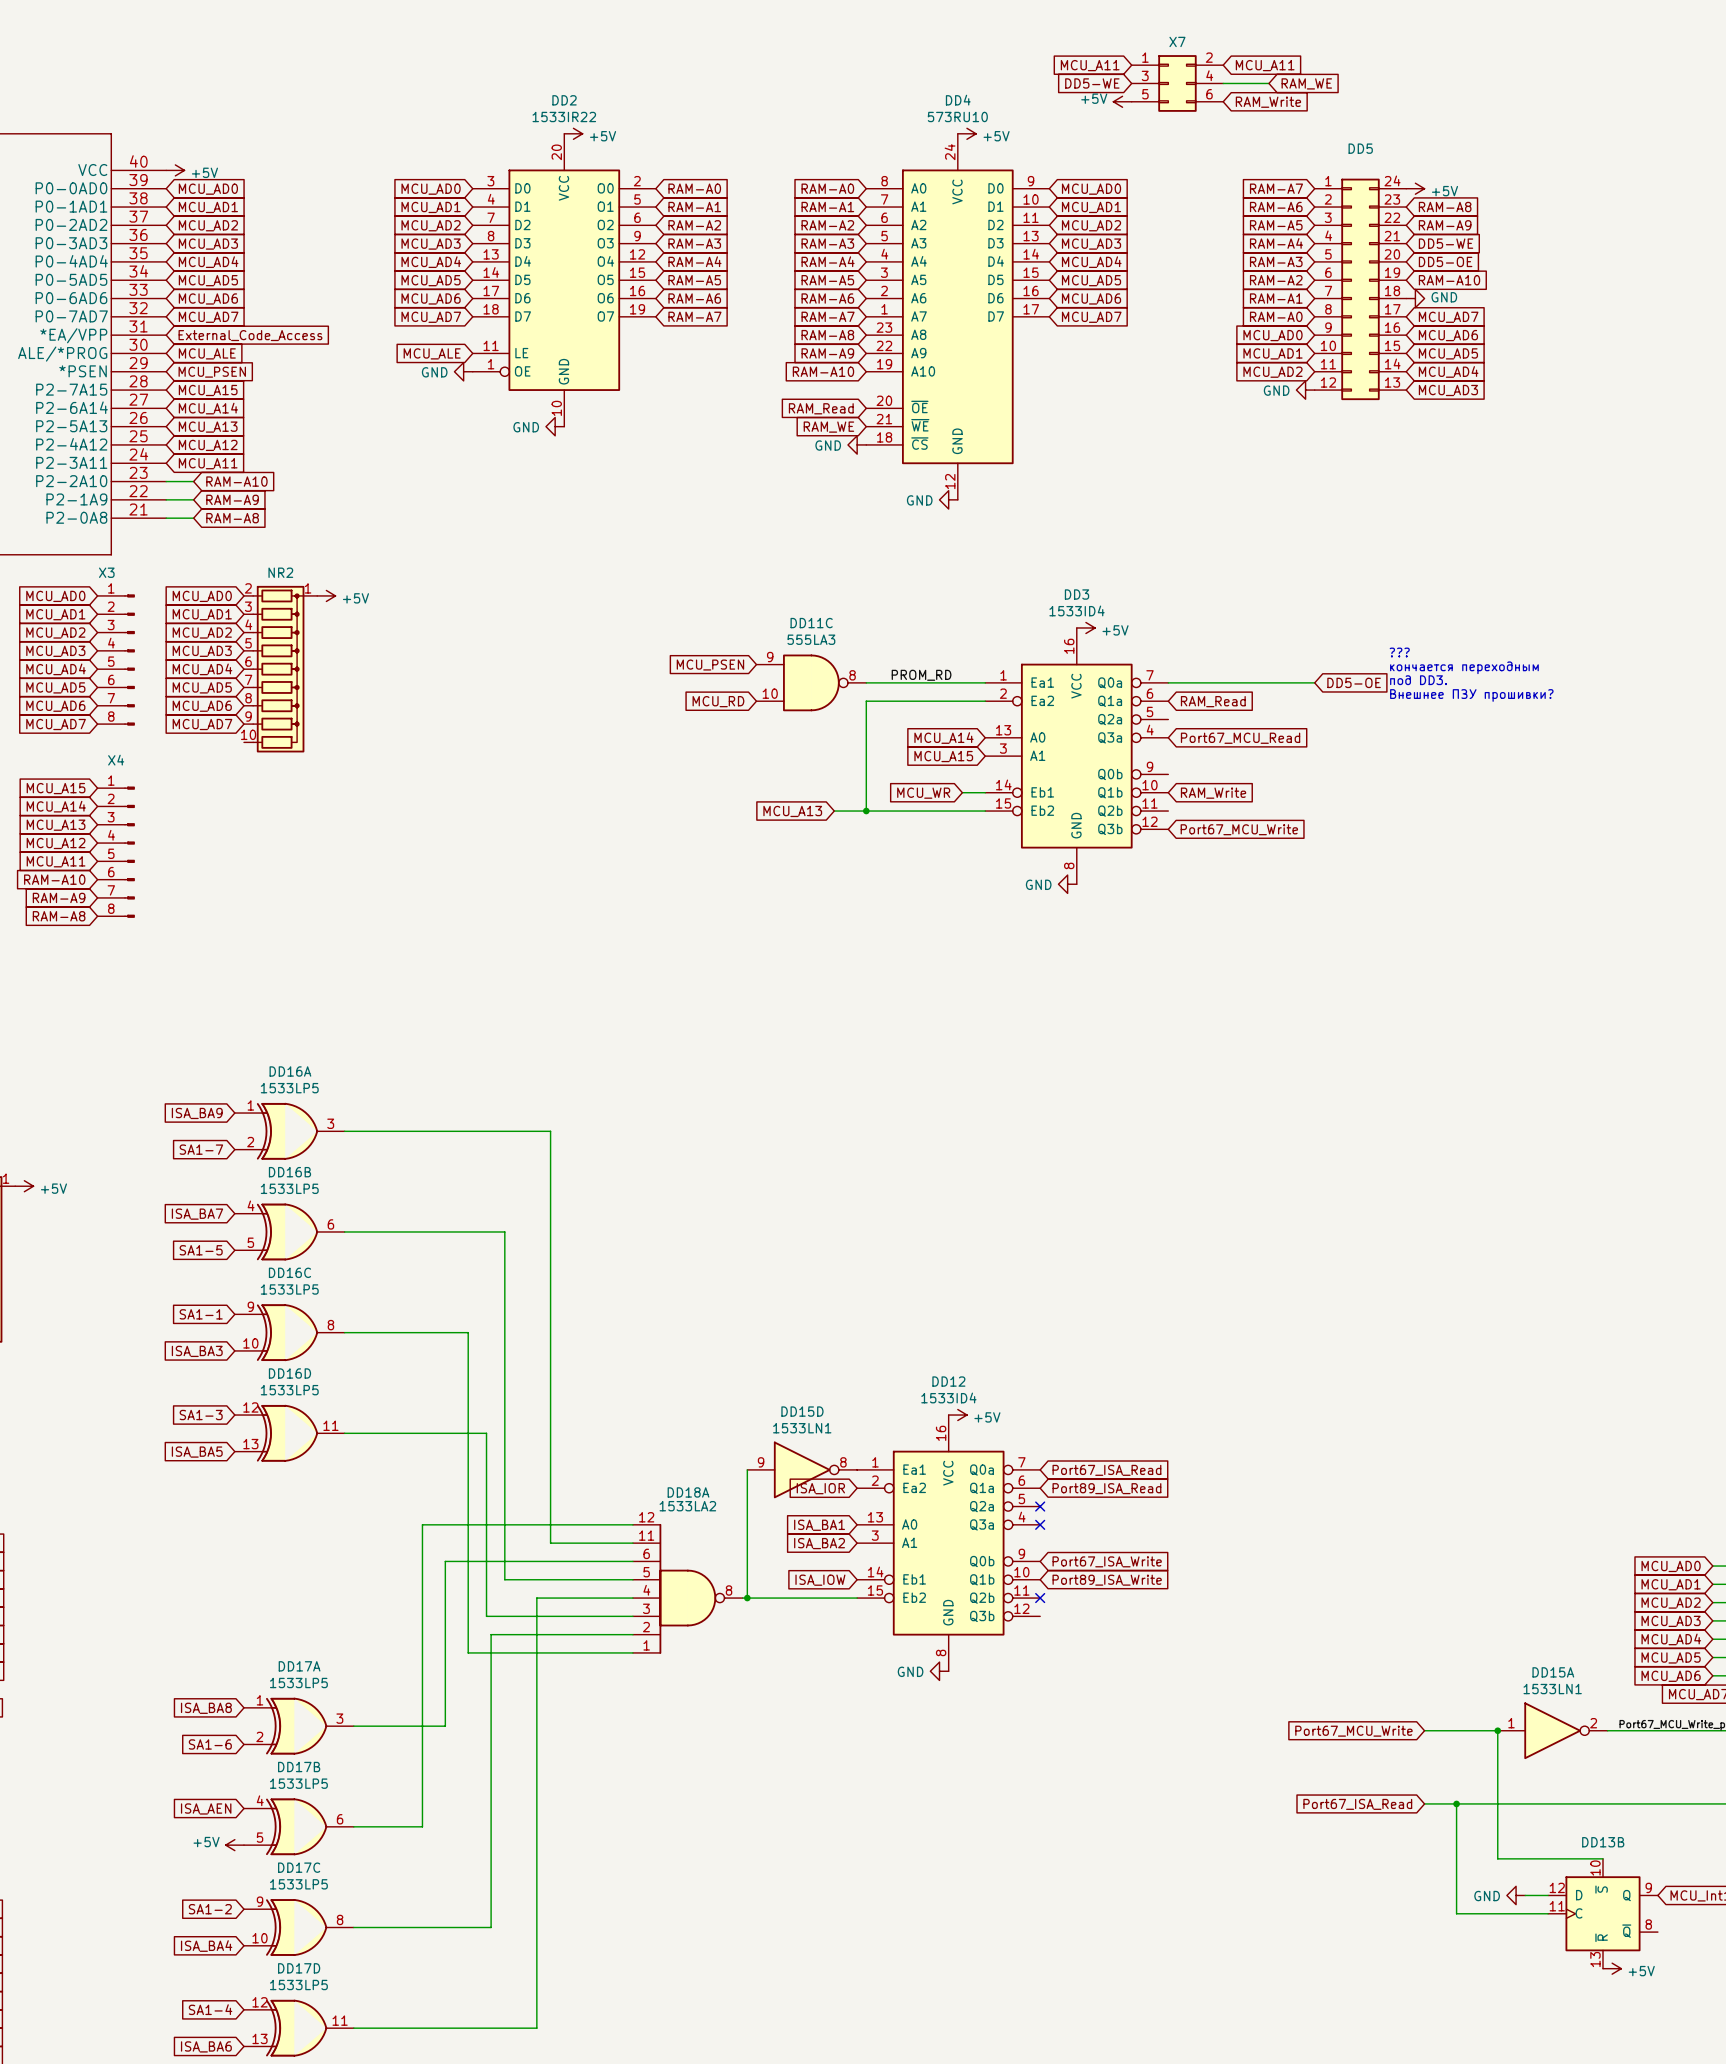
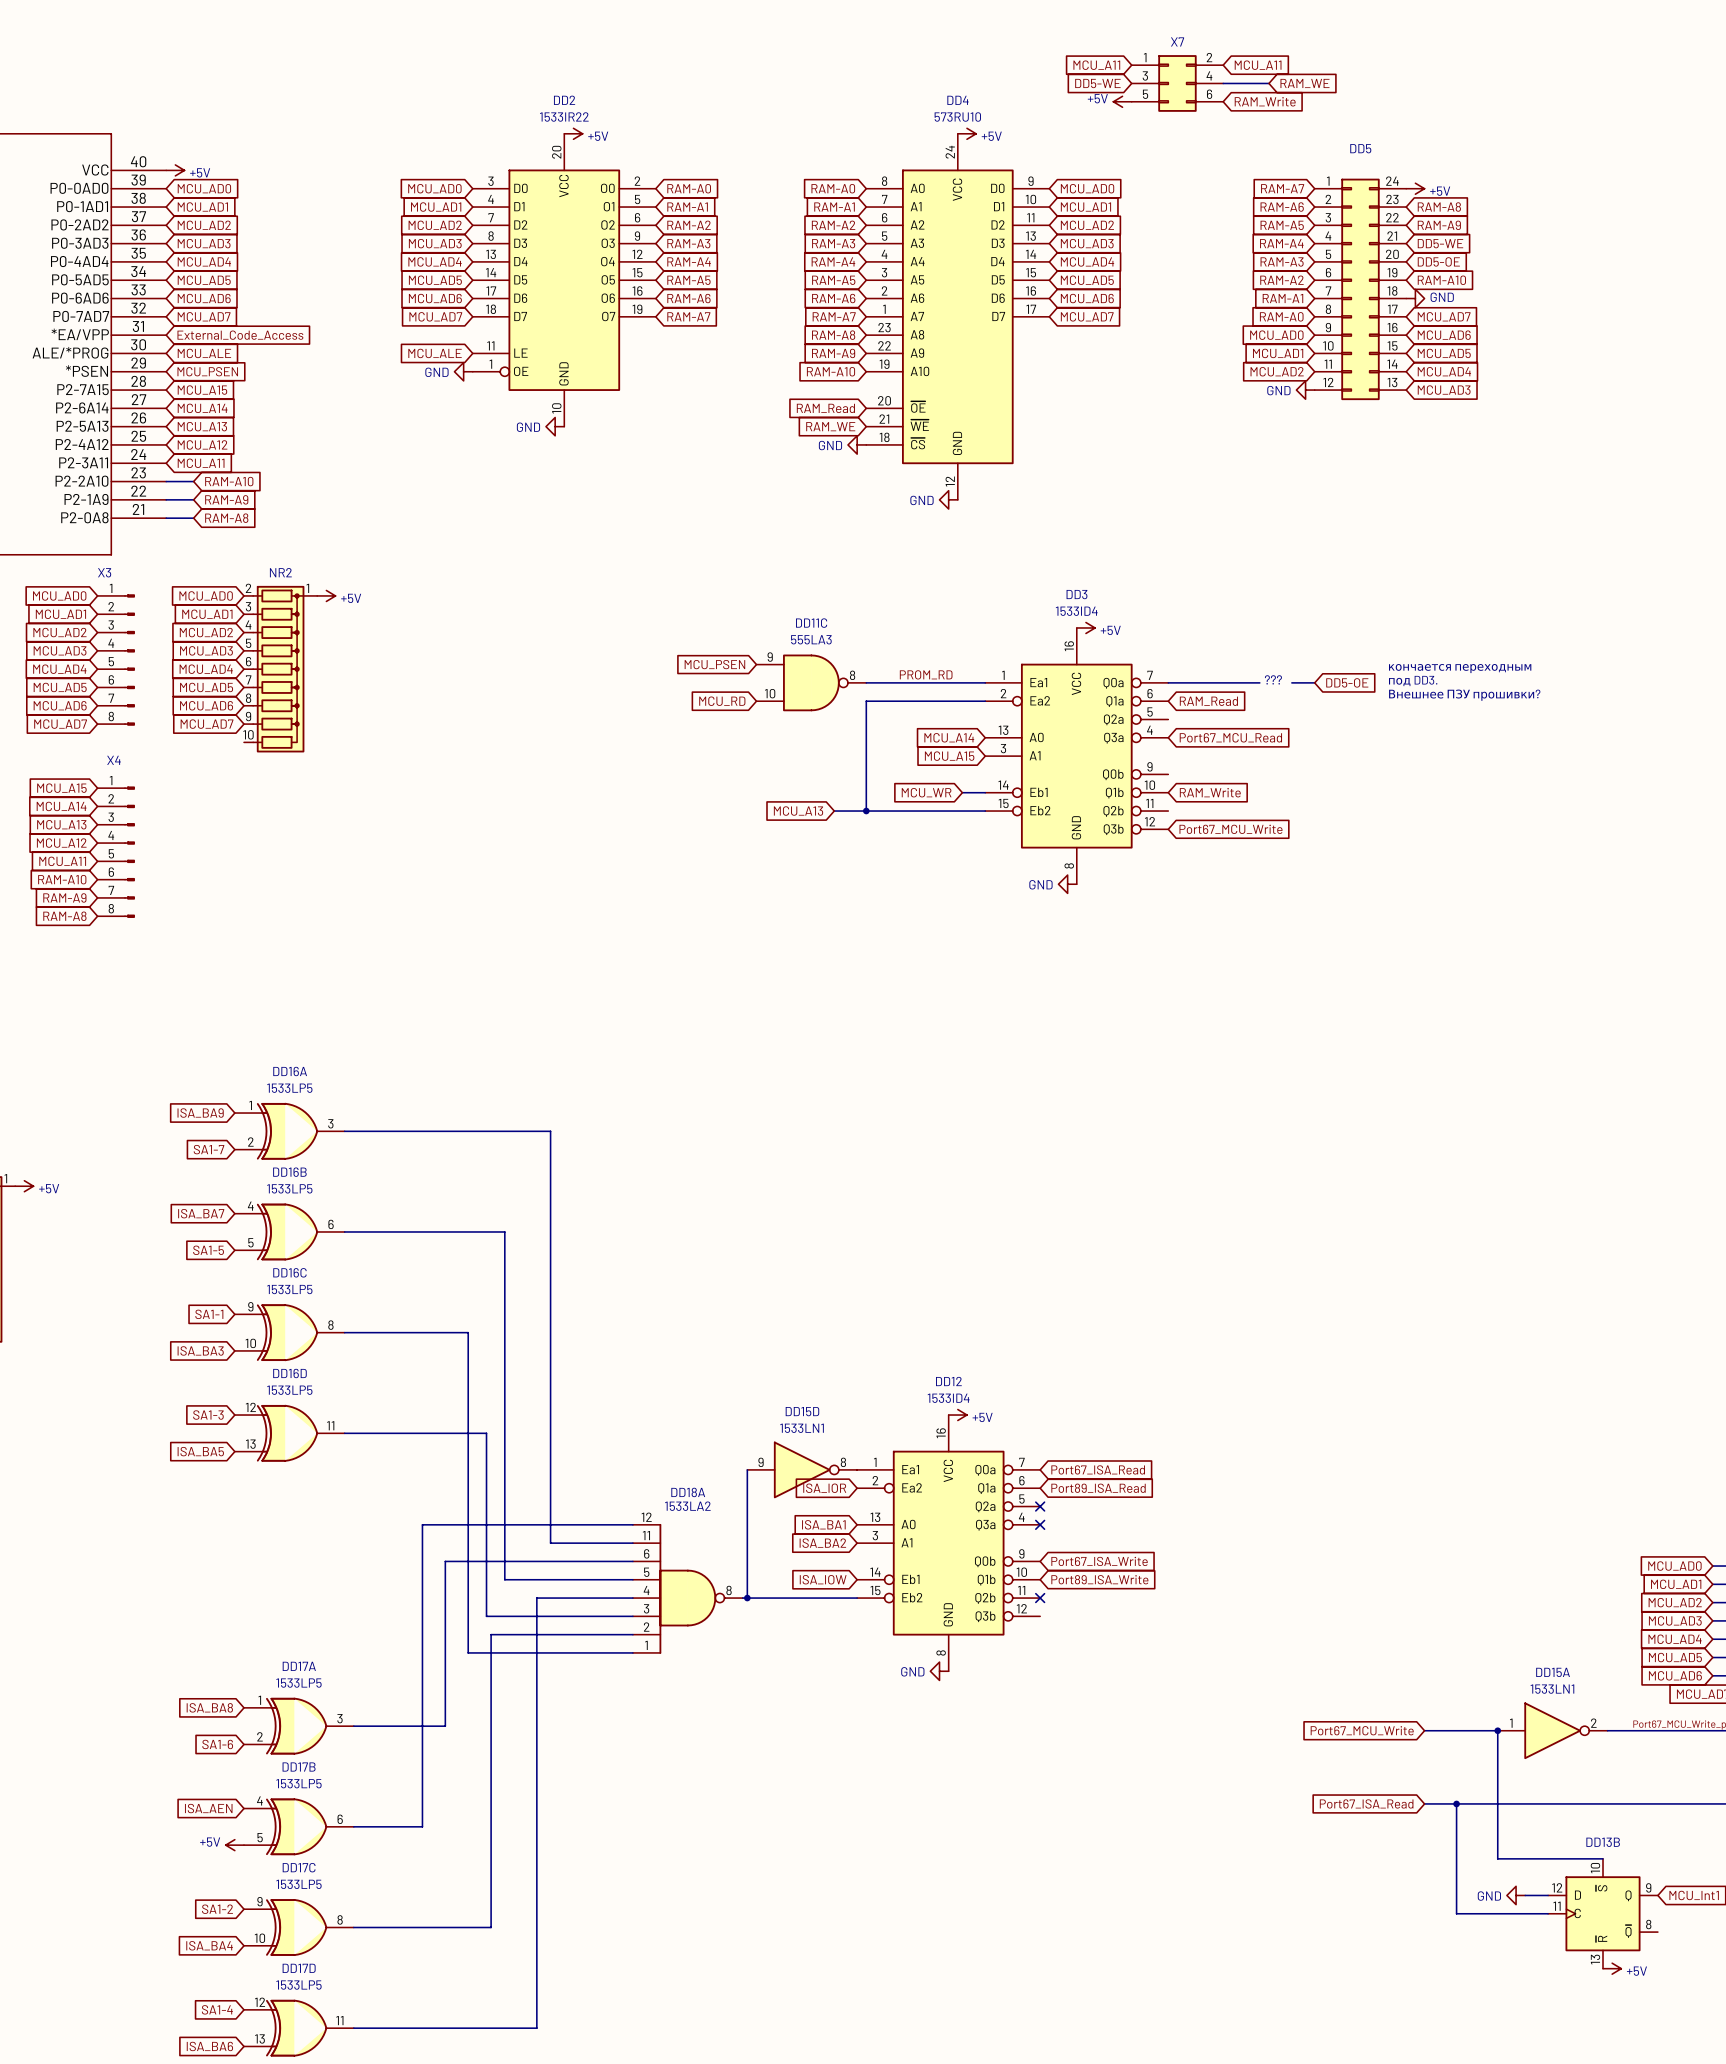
text position: ??? (1399, 652) -> ??? (1273, 679)
wire: (1259, 682) (1291, 682) -> none

